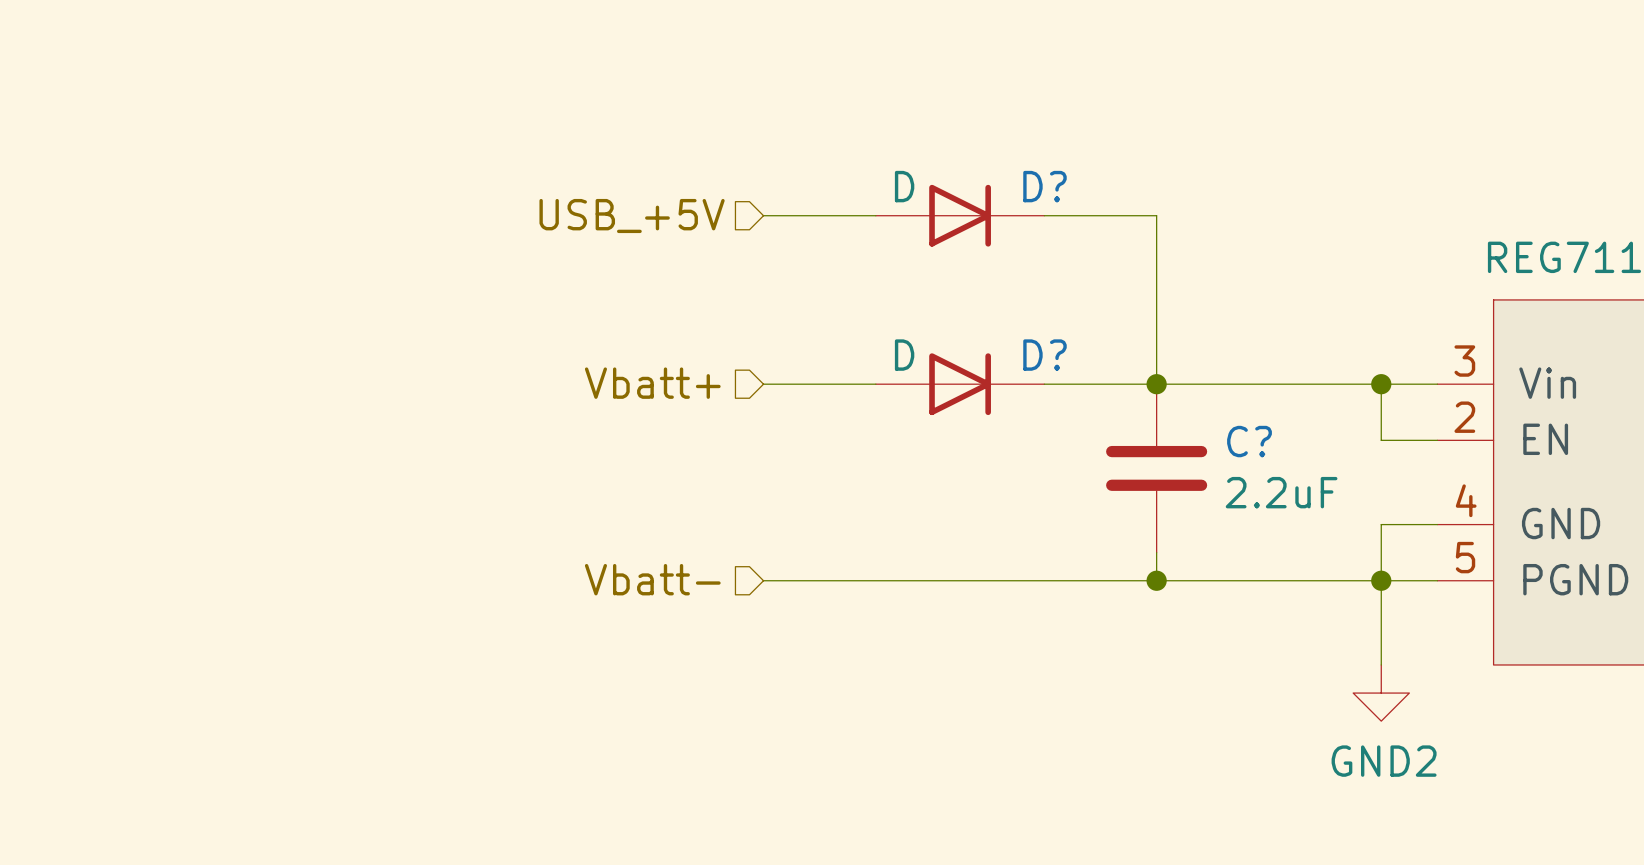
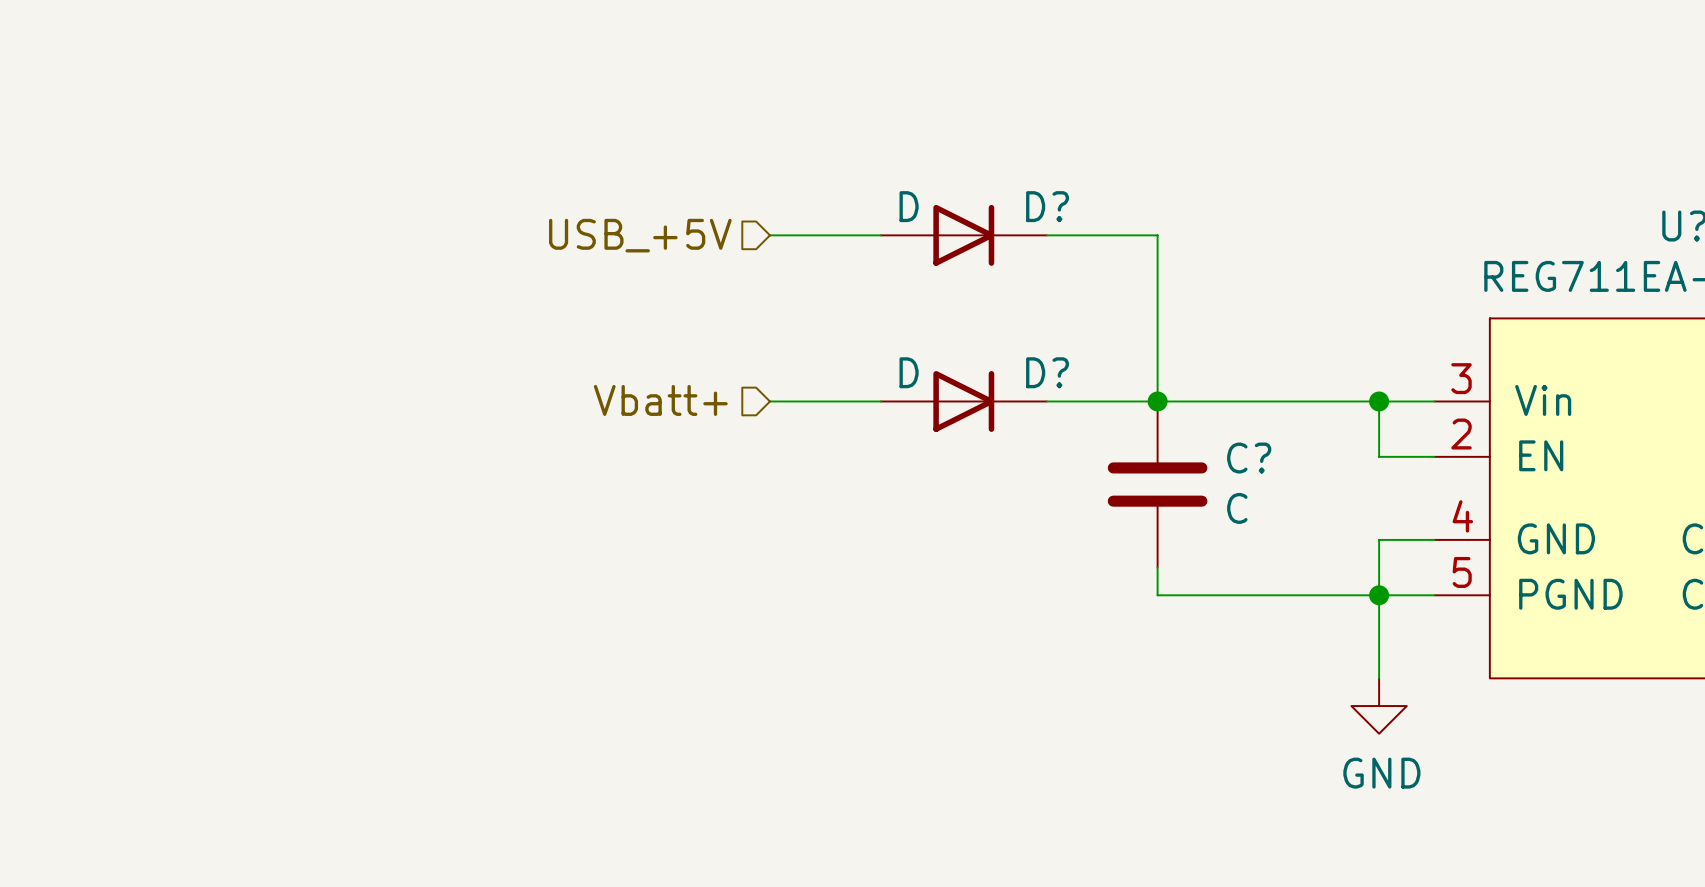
C? value: 2.2uF (1281, 492) -> C (1237, 508)
hierarchical label: Vbatt- (652, 579) -> none
wire: (763, 580) (1156, 580) -> none
junction: (1156, 580) -> none
power symbol: GND2 (1381, 693) -> GND (1379, 706)

